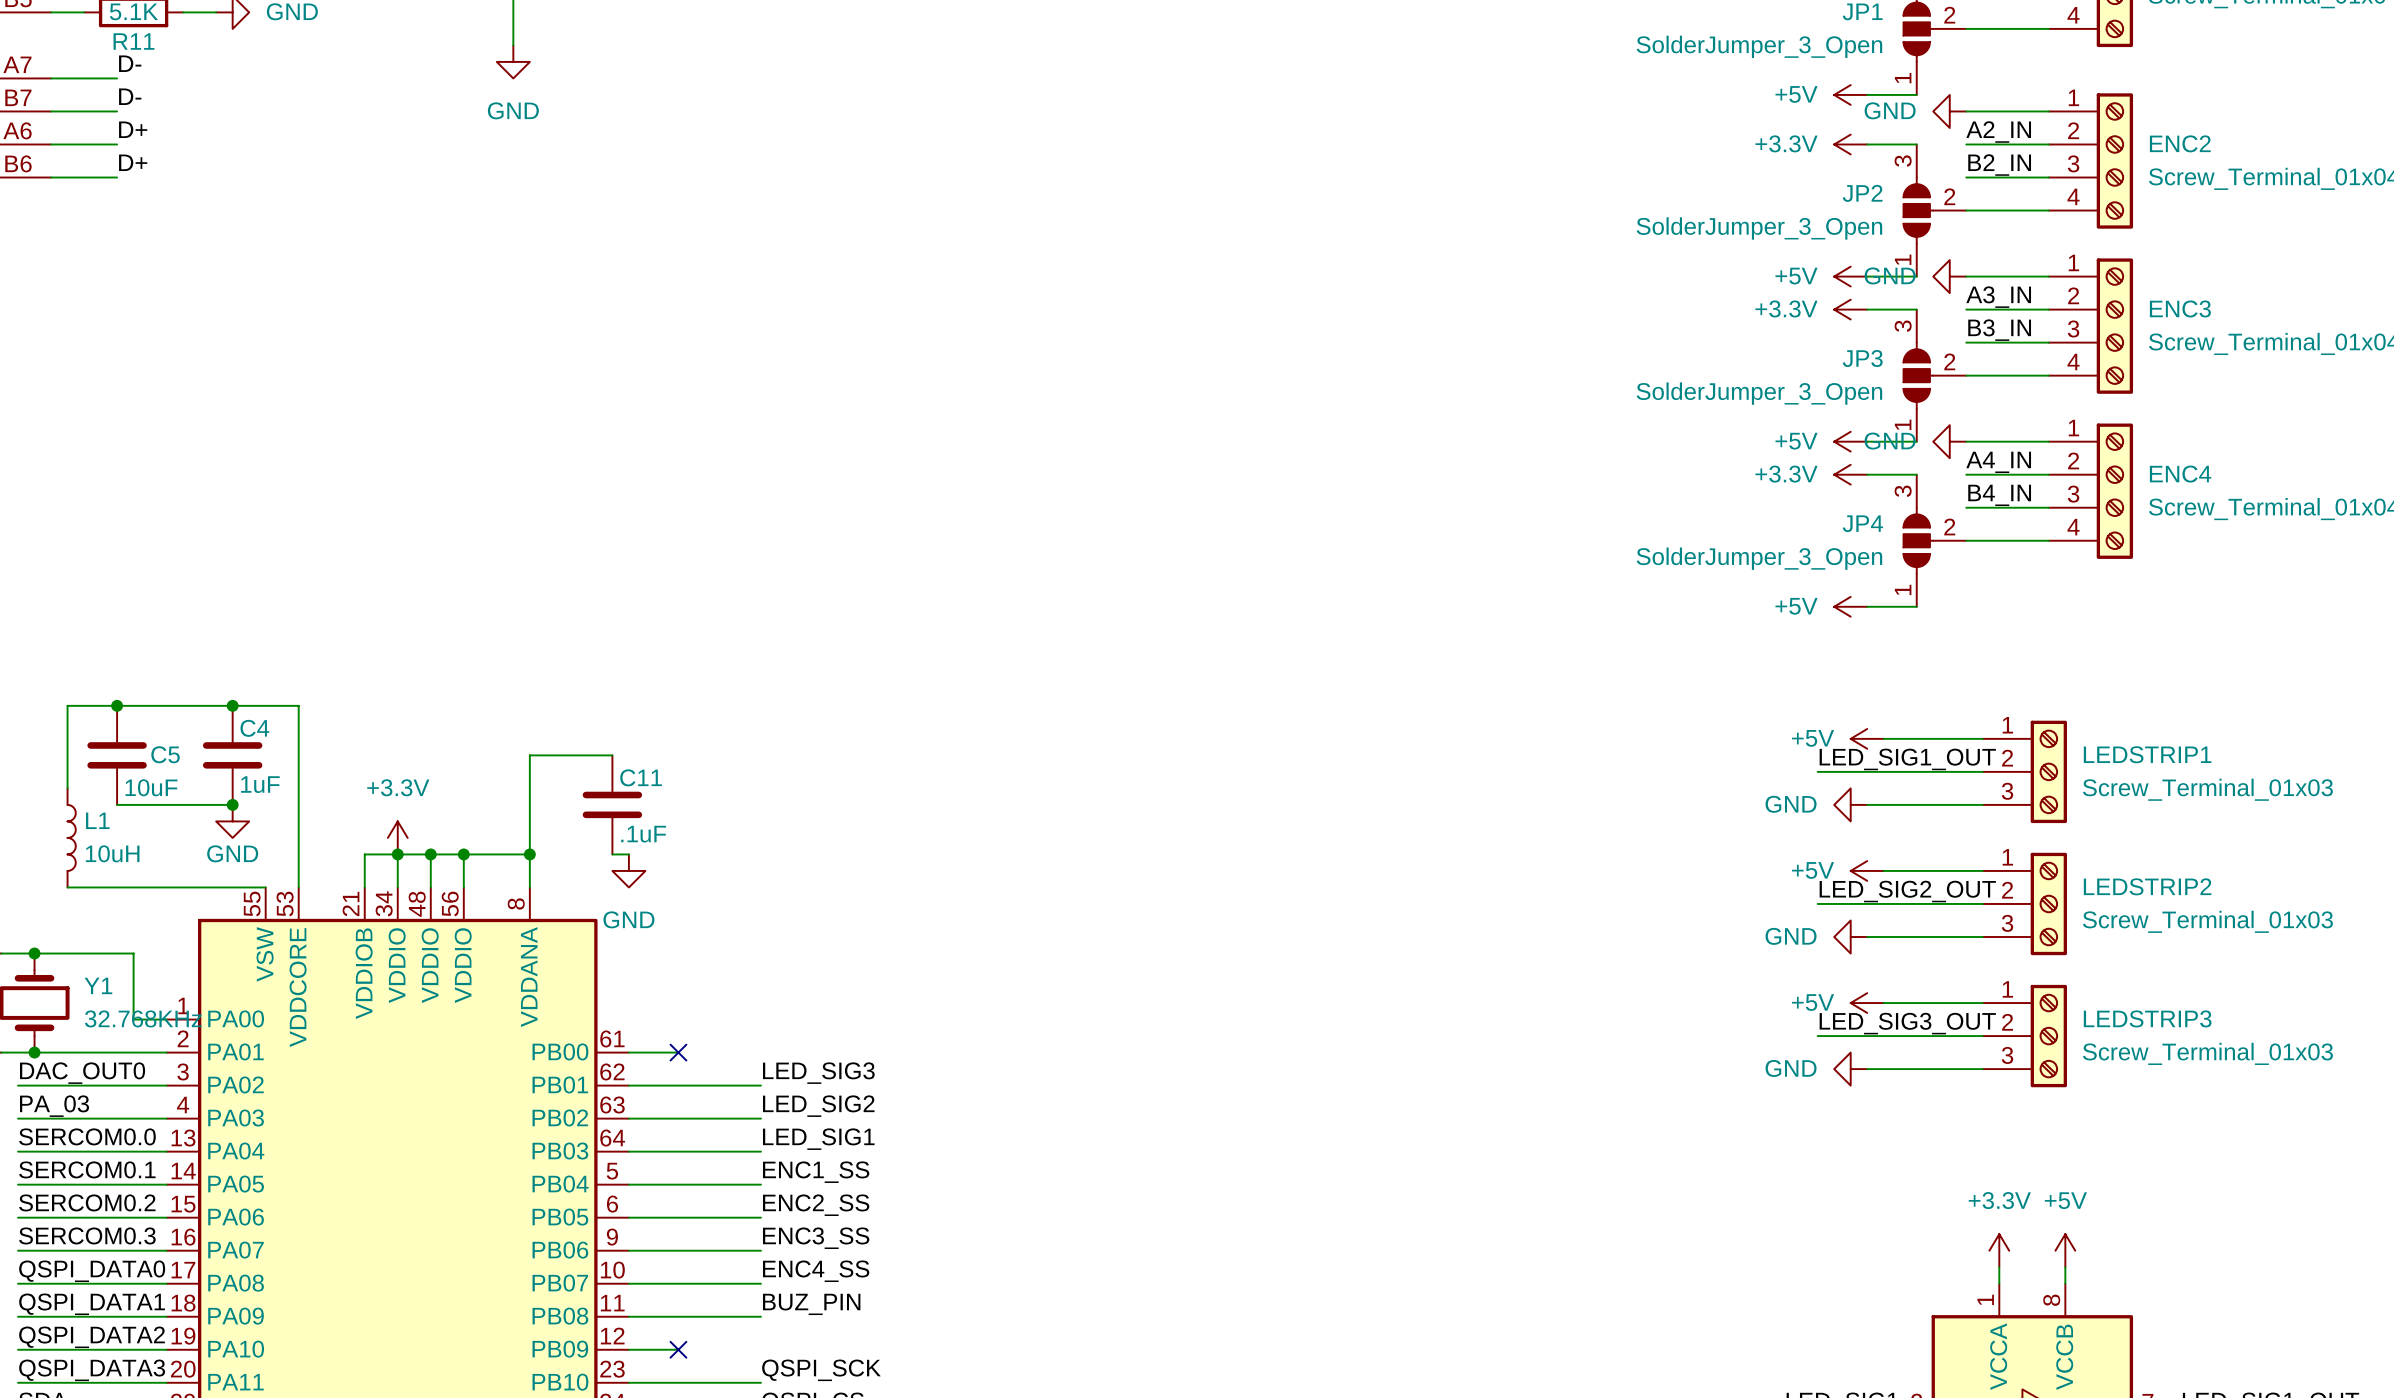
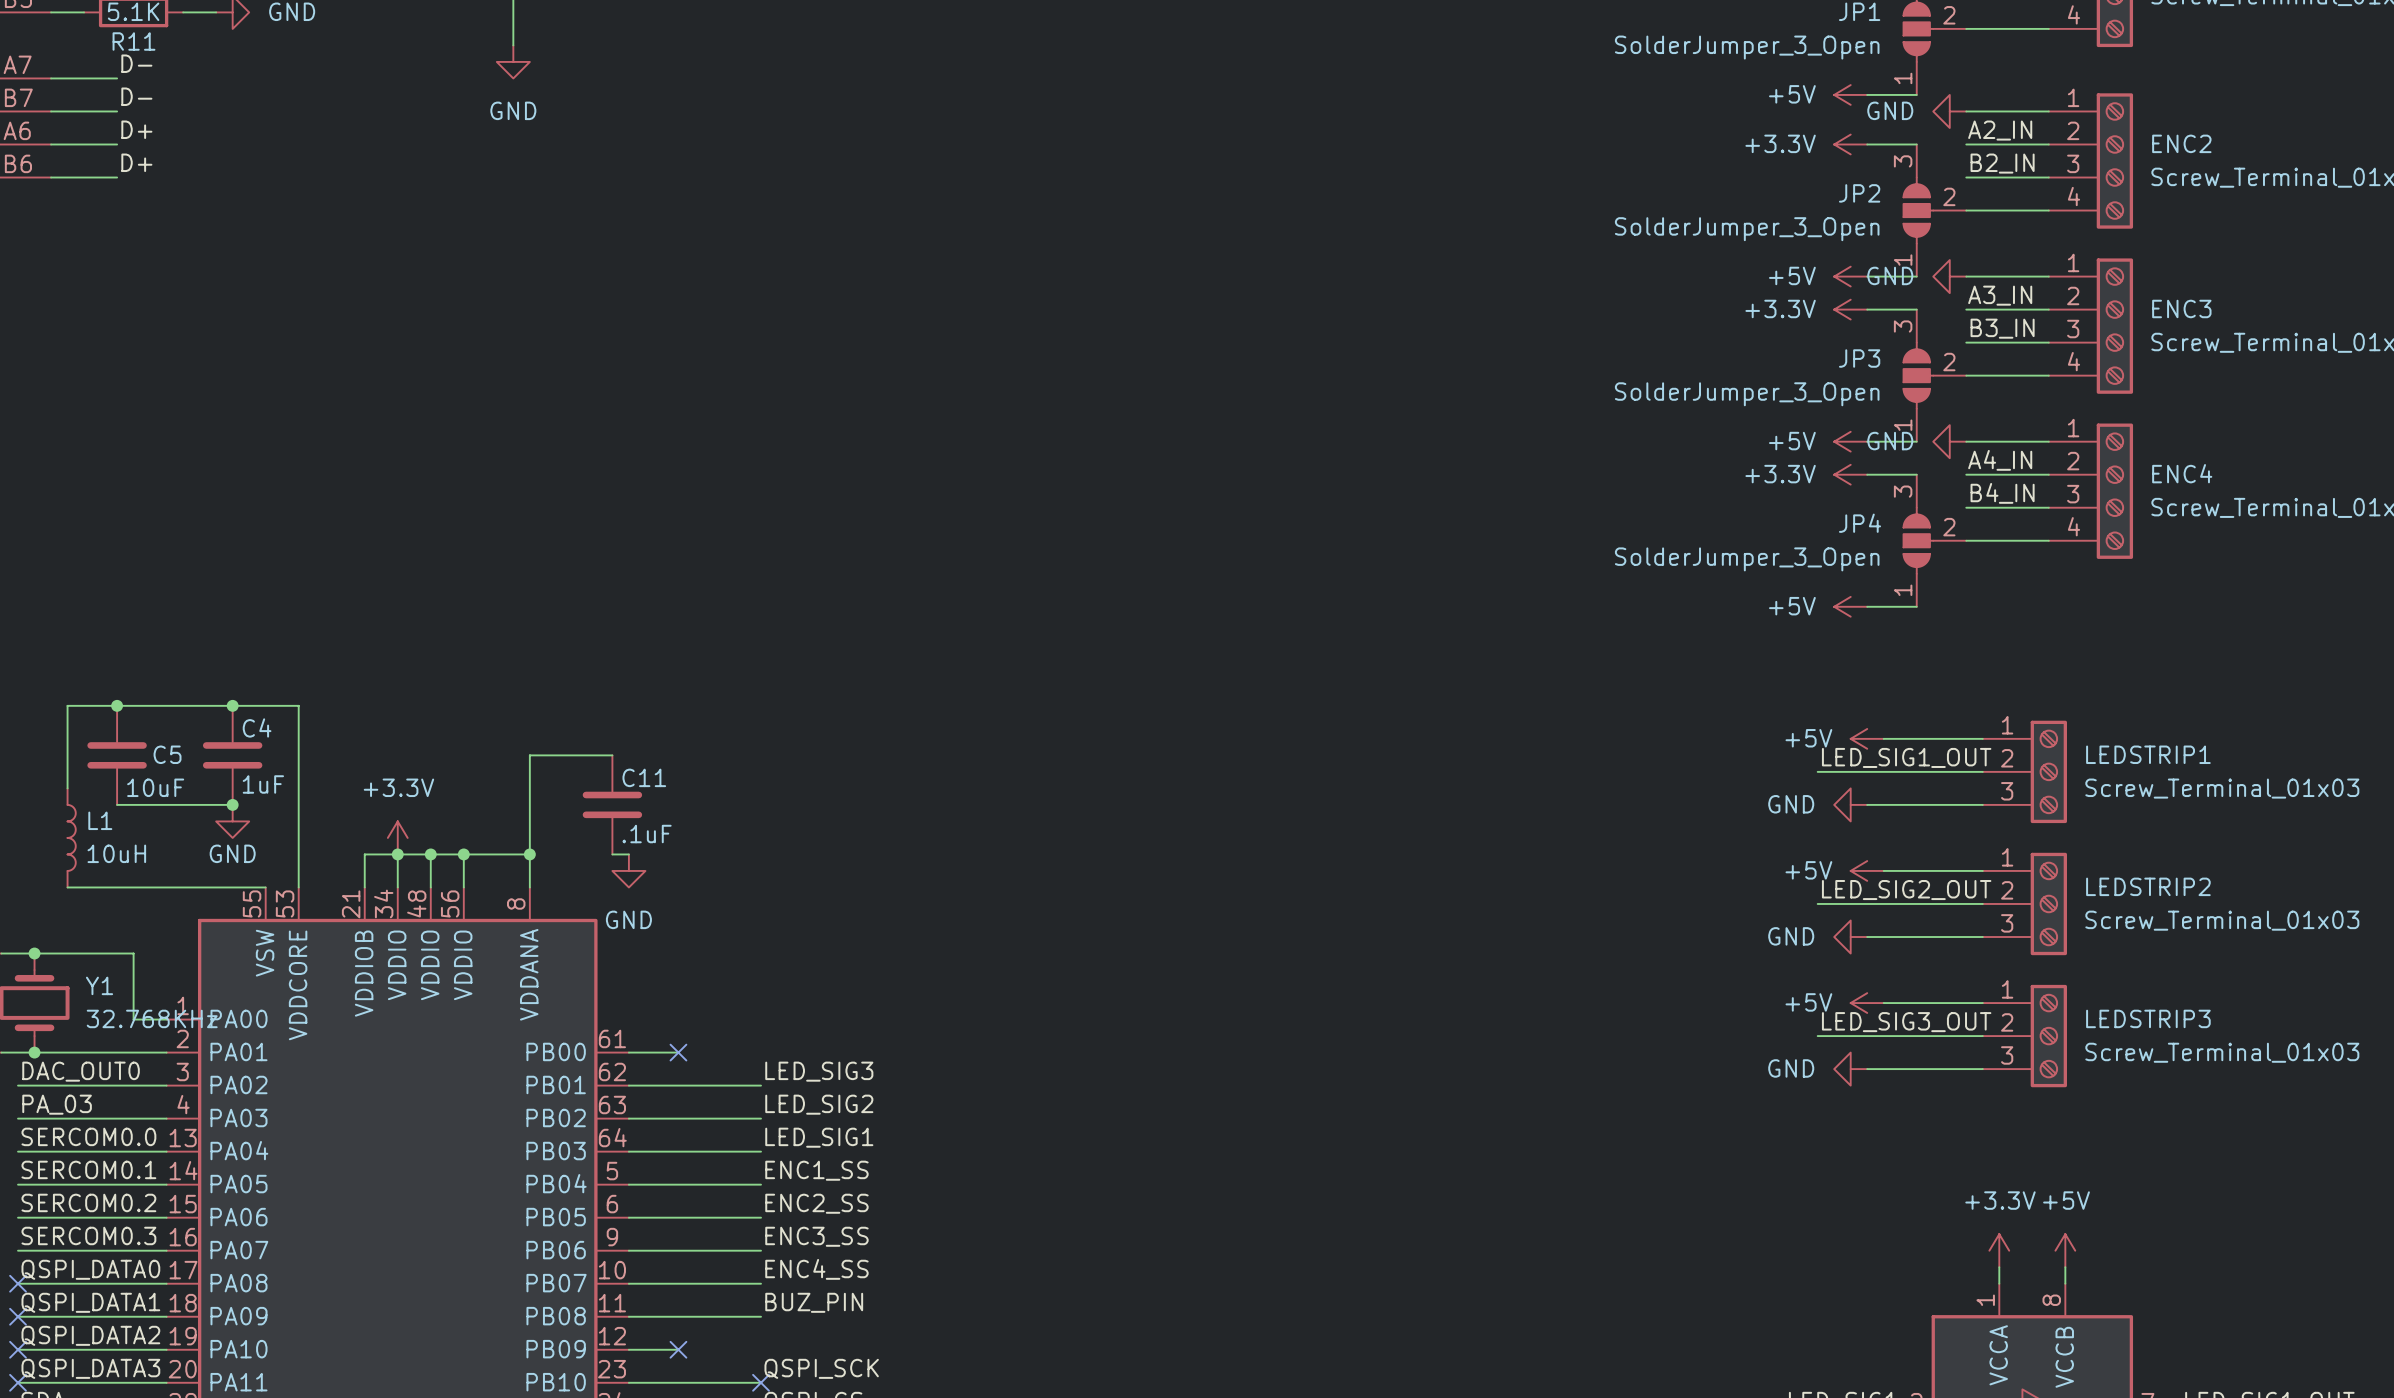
no-connect mark: none -> (18, 1283)
no-connect mark: none -> (18, 1316)
no-connect mark: none -> (18, 1349)
no-connect mark: none -> (18, 1382)
no-connect mark: none -> (761, 1382)

